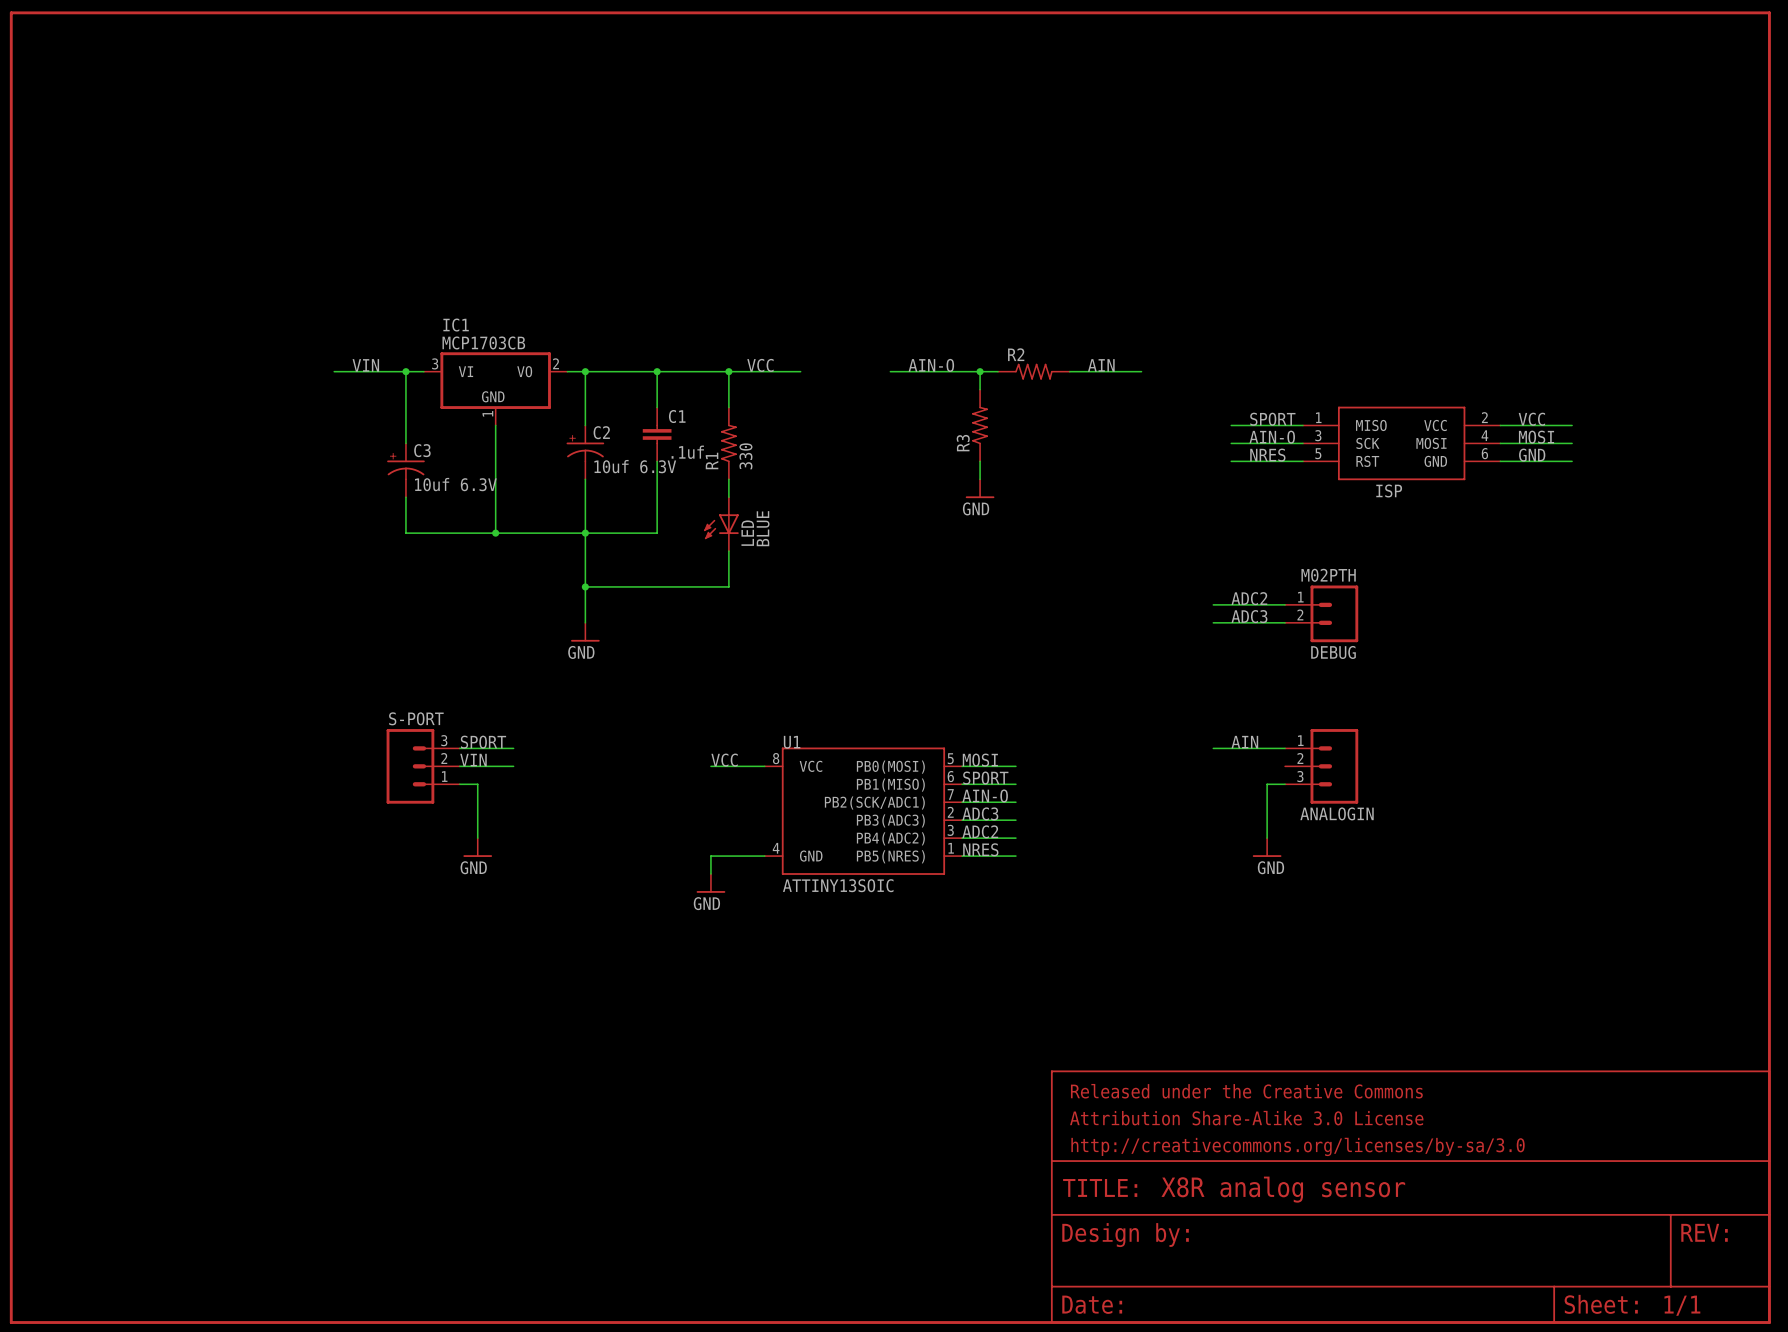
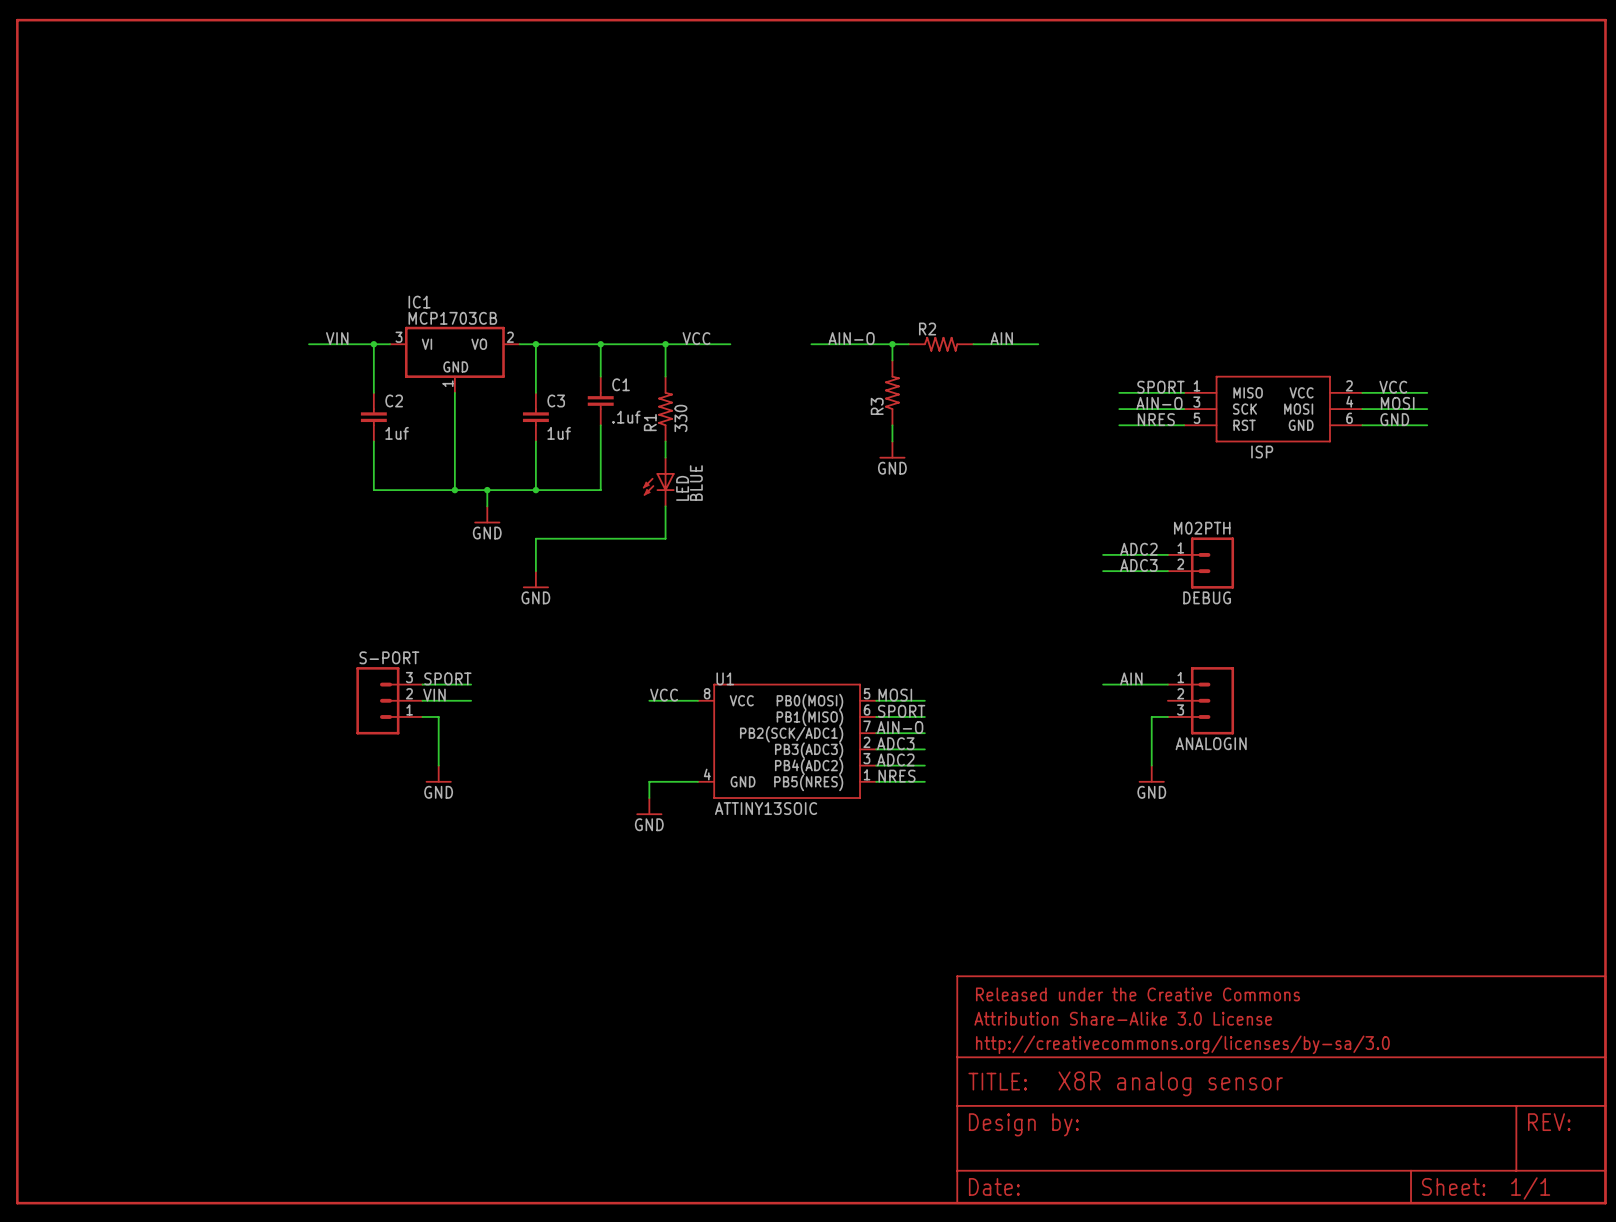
C2 symbol: [566, 425, 605, 480] -> [360, 392, 387, 442]
C3 symbol: [387, 443, 425, 498] -> [522, 392, 549, 442]
C2 value: 10uf 6.3V (635, 466) -> 1uf (397, 433)
C3 value: 10uf 6.3V (455, 484) -> 1uf (559, 433)
wire: none -> (487, 490) (487, 506)
junction: none -> (487, 490)
wire: (585, 533) (585, 586) -> none
power symbol: none -> GND (487, 514)
junction: (585, 586) -> none

